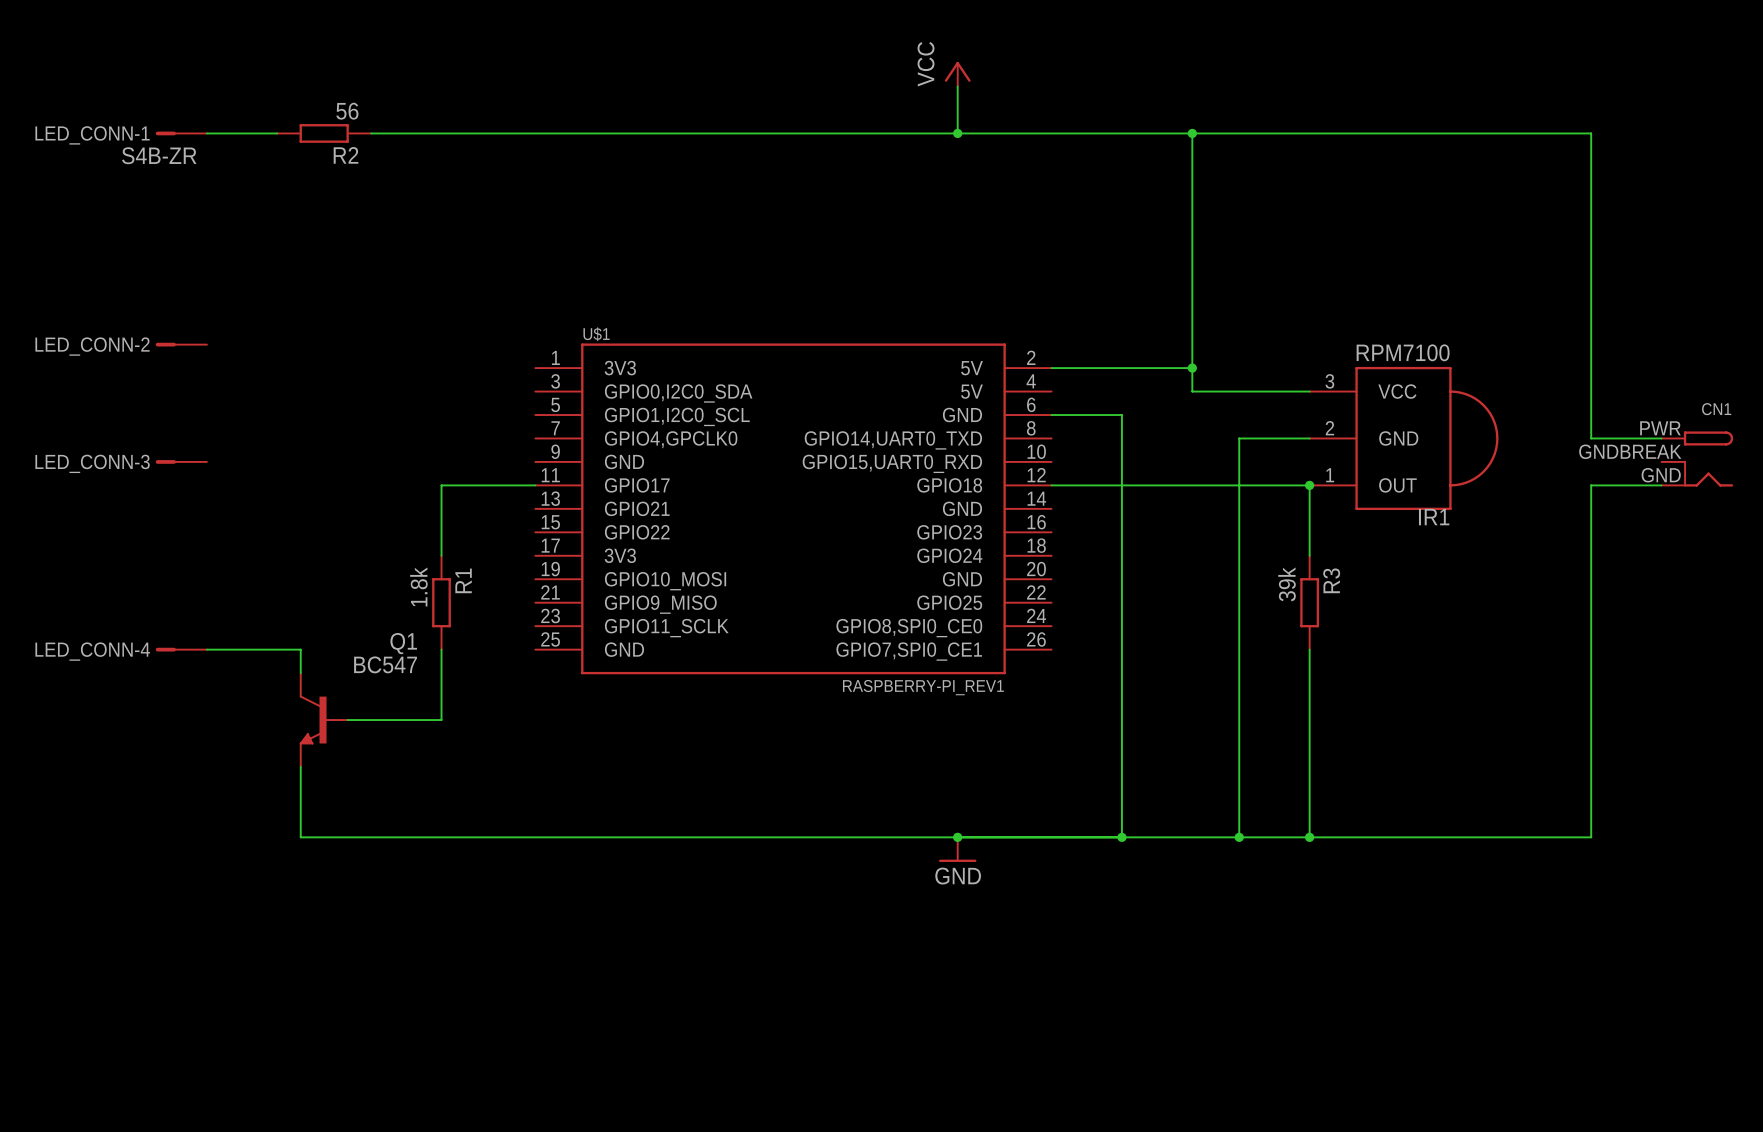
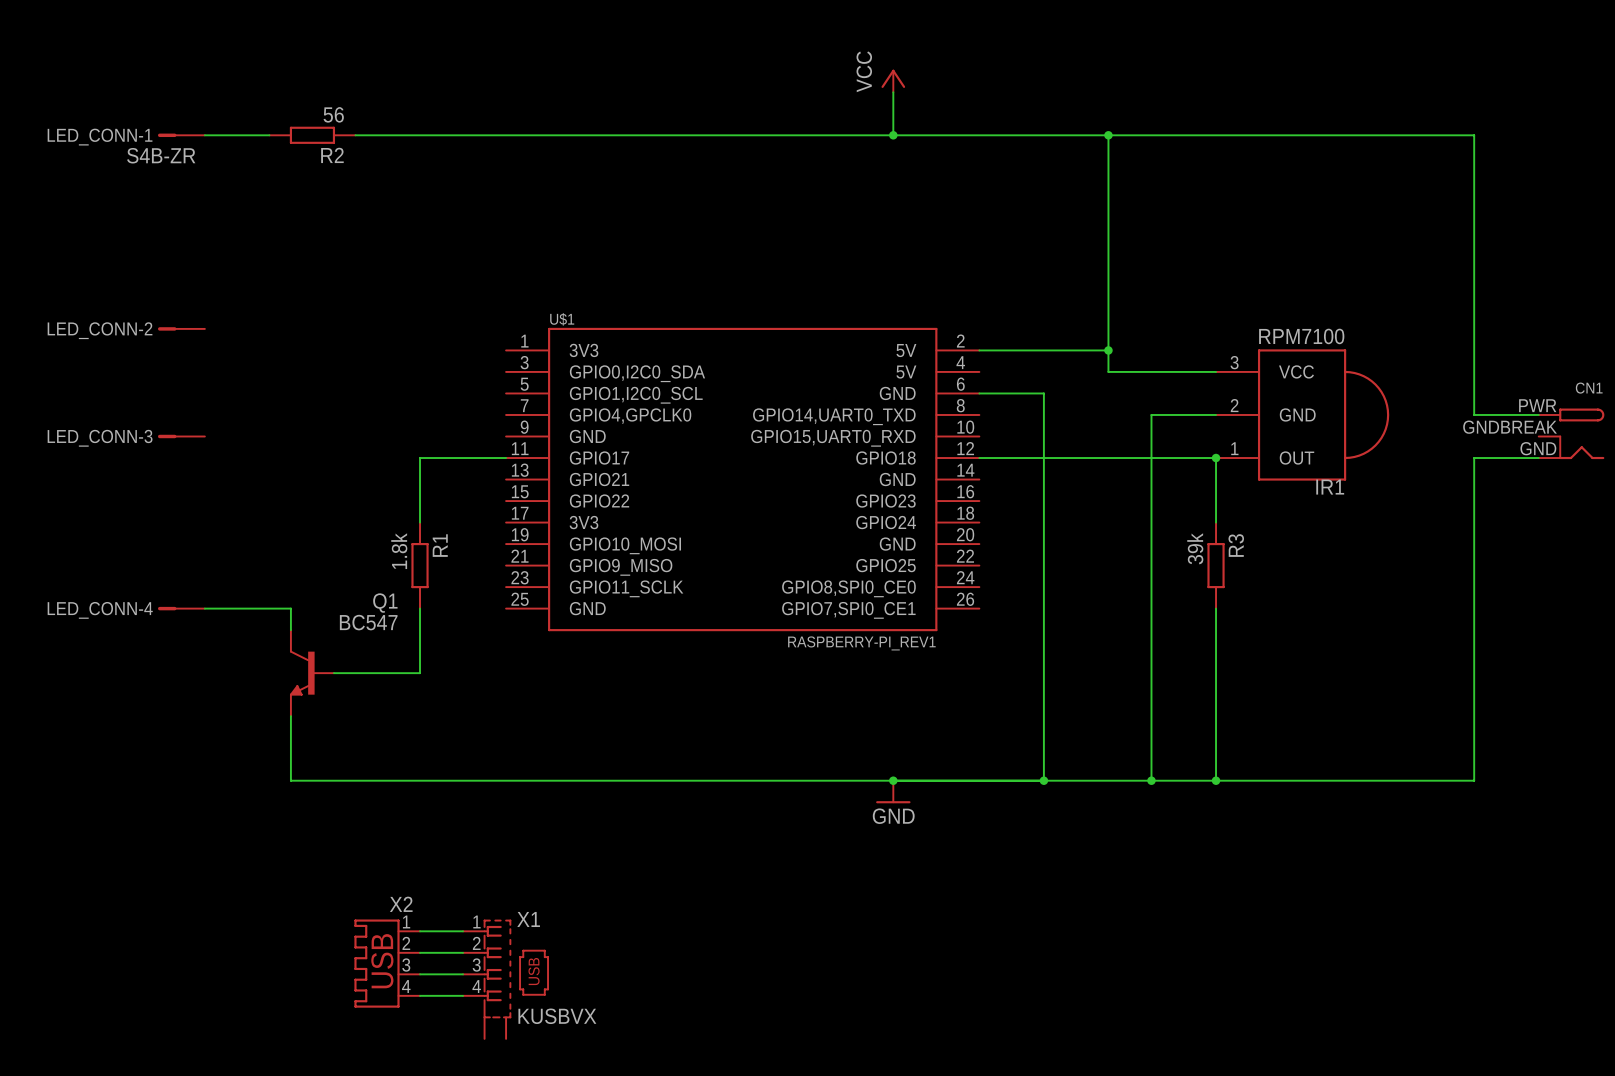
wire: none -> (420, 931) (463, 931)
wire: none -> (420, 952) (463, 952)
X2: none -> (387, 963)
wire: none -> (420, 974) (463, 974)
X1: none -> KUSBVX (505, 979)
wire: none -> (420, 995) (463, 995)

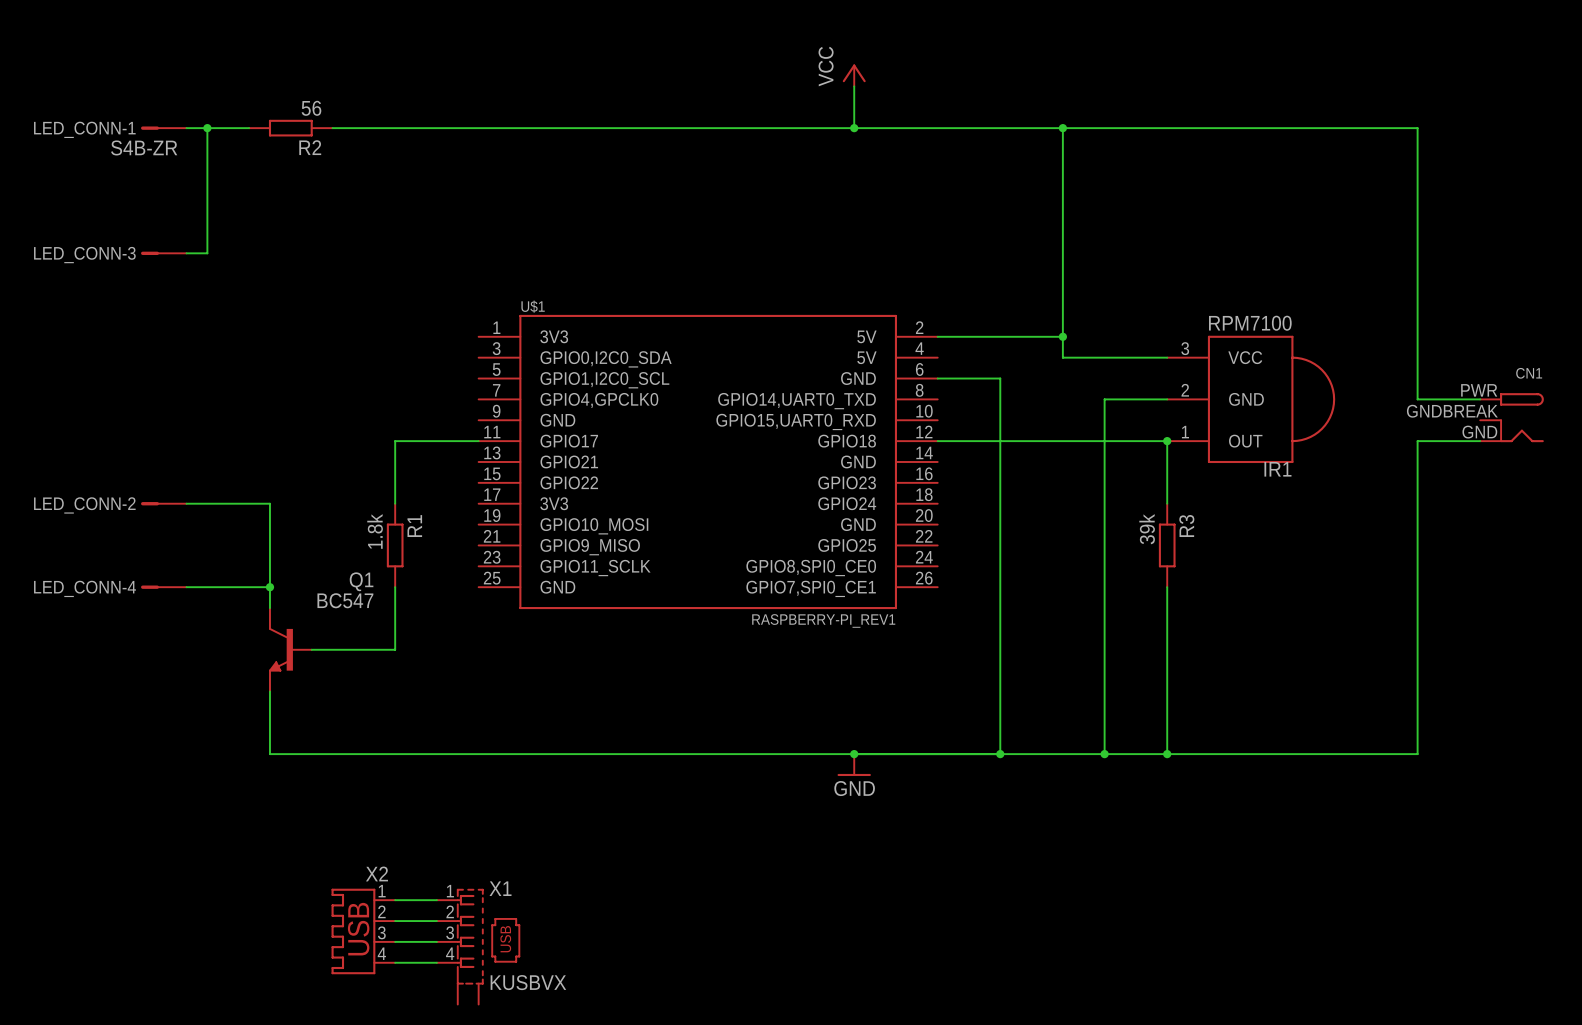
wire: none -> (207, 128) (207, 253) (186, 253)
junction: none -> (207, 128)
LED_CONN-2 position: (181, 328) -> (163, 503)
LED_CONN-3 position: (181, 436) -> (163, 253)
wire: none -> (186, 503) (269, 503) (269, 587)
junction: none -> (269, 587)

